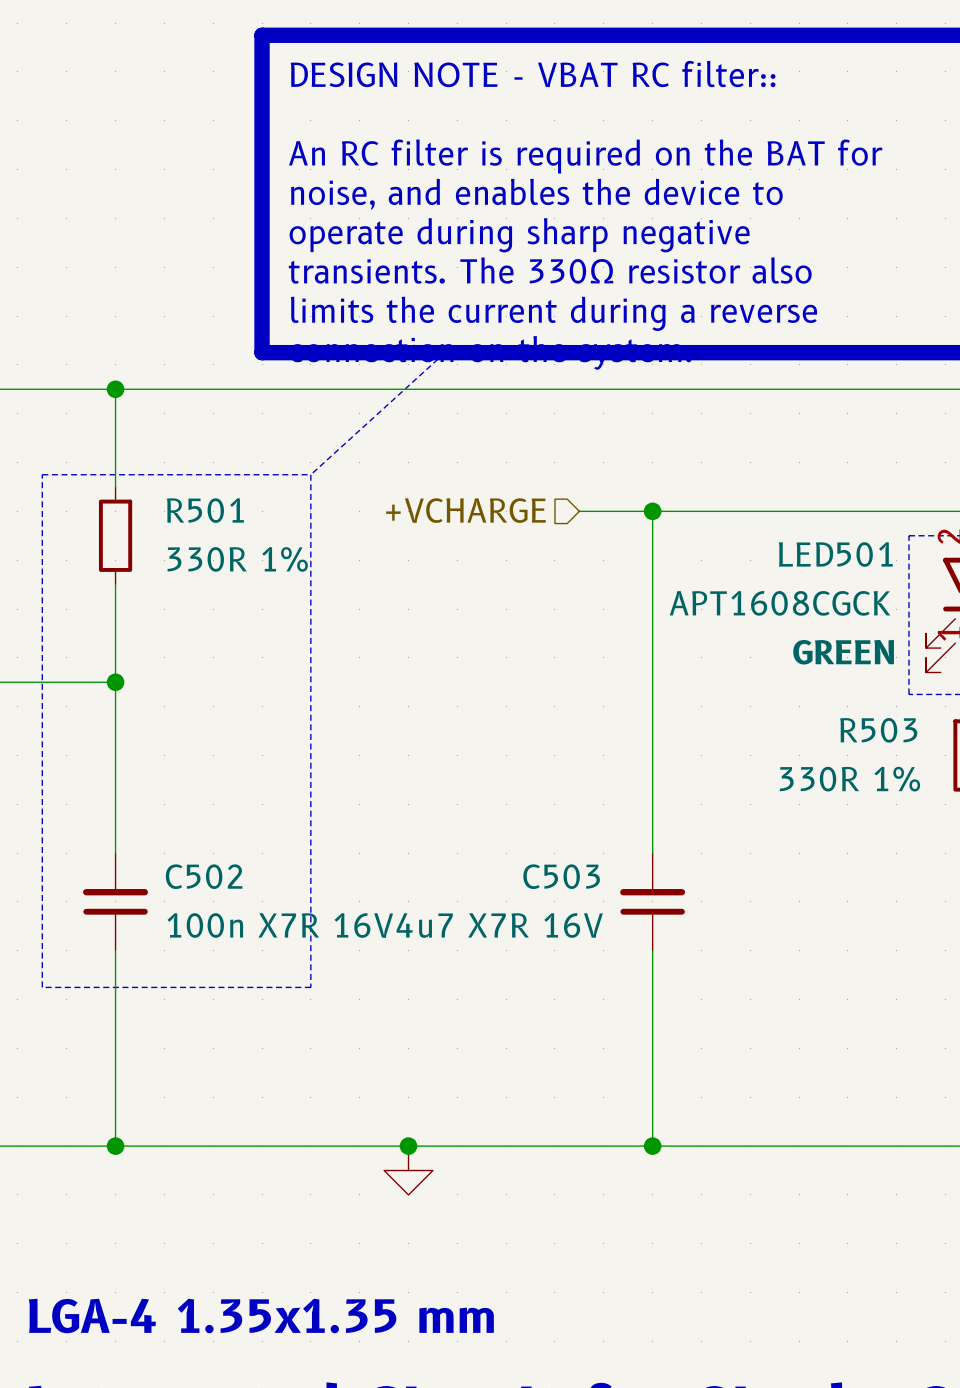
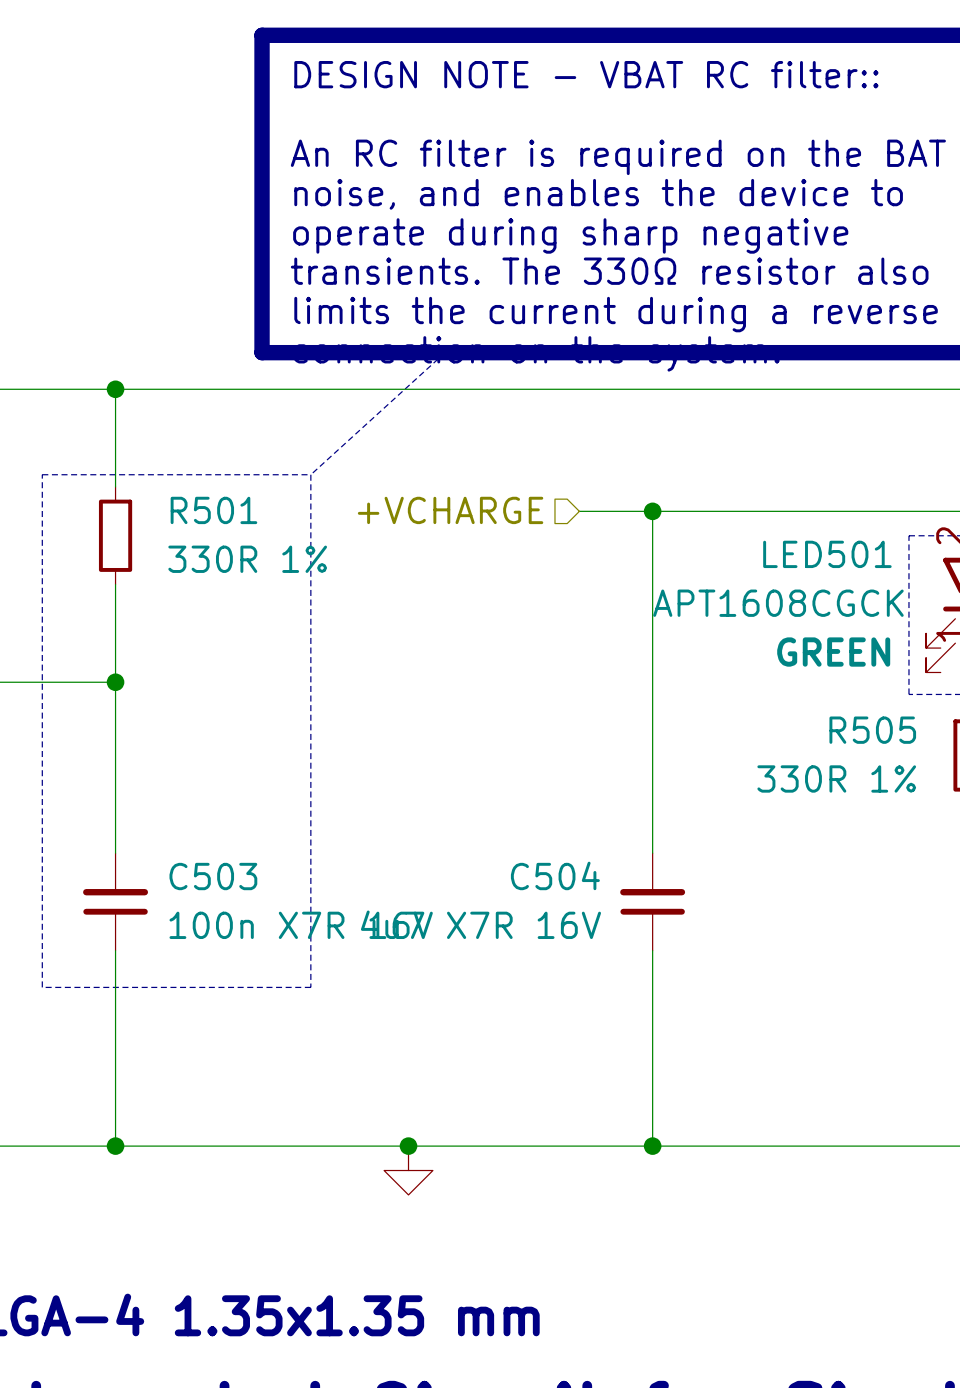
R503 name: R503 (878, 730) -> R505 (872, 730)
C502 name: C502 (204, 876) -> C503 (213, 876)
C503 name: C503 (561, 876) -> C504 (555, 875)

